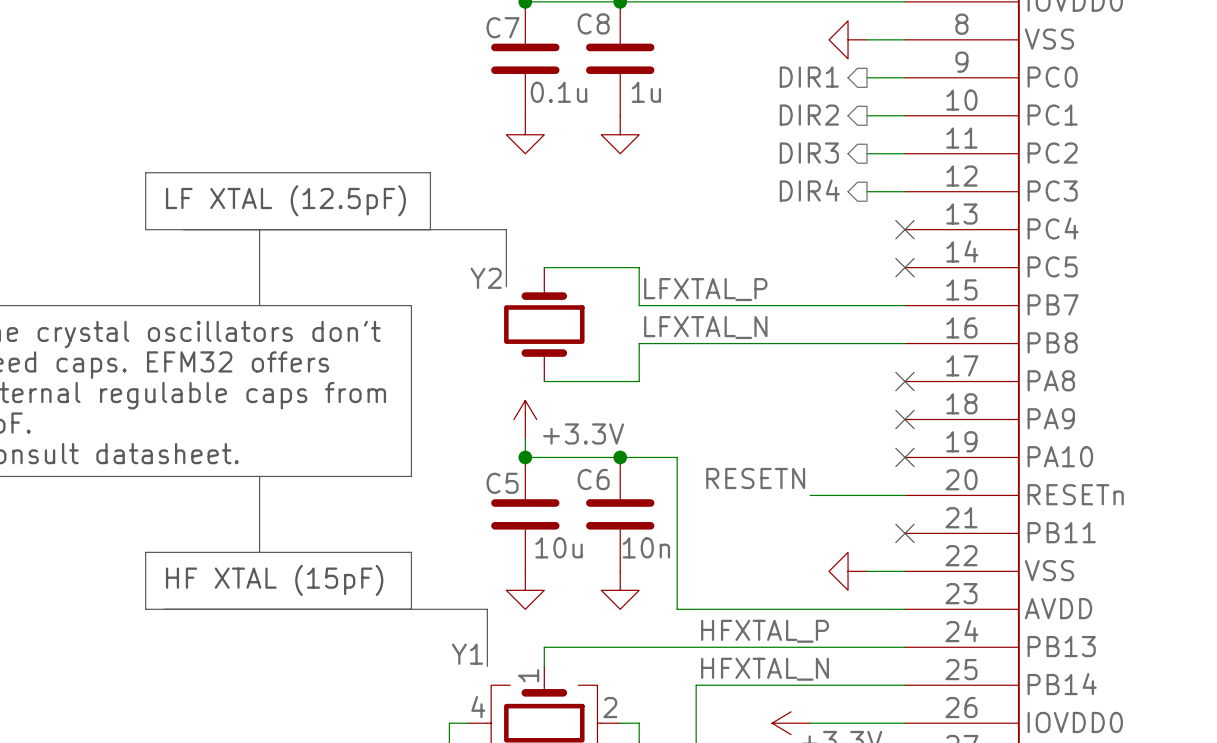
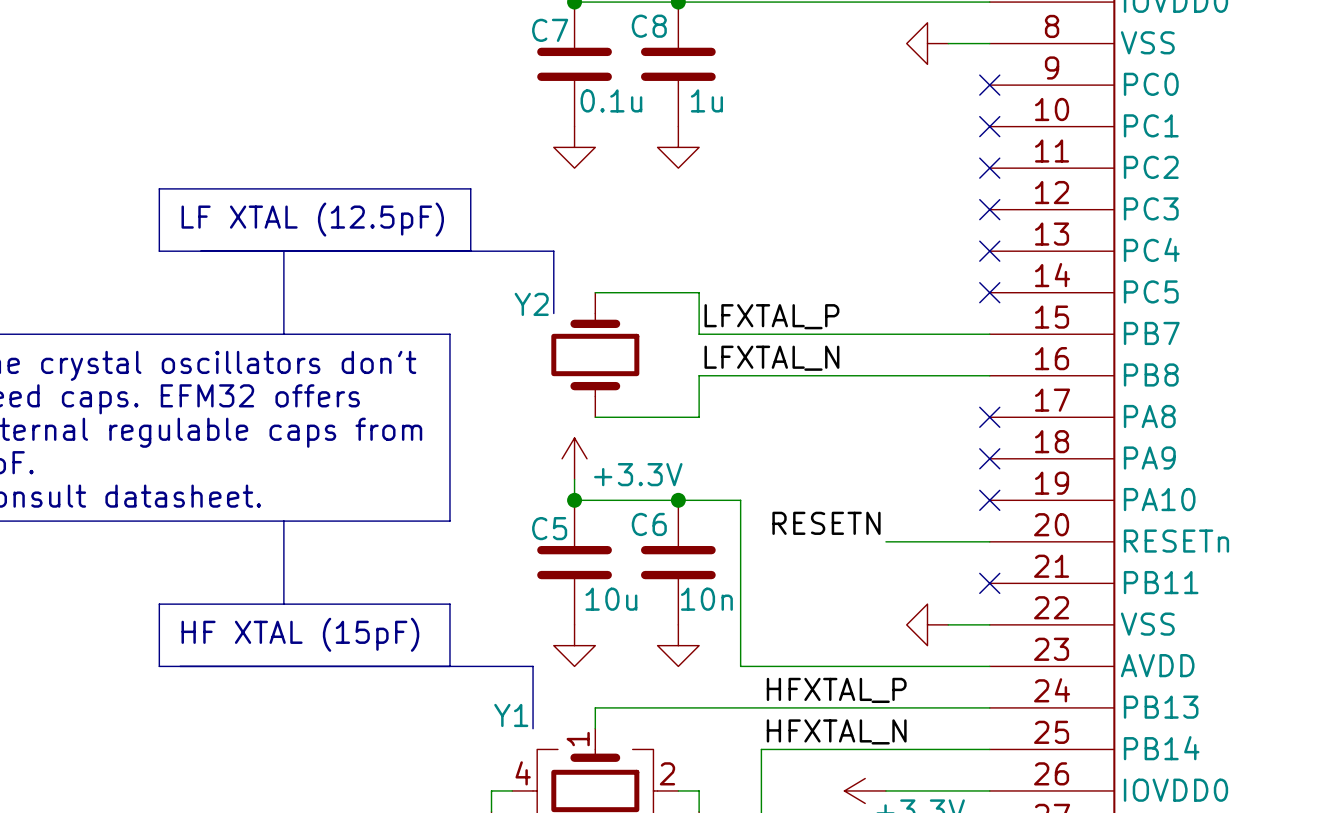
hierarchical label: DIR1 (809, 77) -> none
wire: (867, 77) (904, 77) -> none
no-connect mark: none -> (989, 85)
hierarchical label: DIR2 (809, 115) -> none
wire: (867, 115) (904, 115) -> none
no-connect mark: none -> (989, 126)
hierarchical label: DIR3 (809, 153) -> none
wire: (867, 153) (904, 153) -> none
no-connect mark: none -> (989, 168)
hierarchical label: DIR4 (809, 190) -> none
wire: (867, 191) (904, 191) -> none
no-connect mark: none -> (989, 209)

